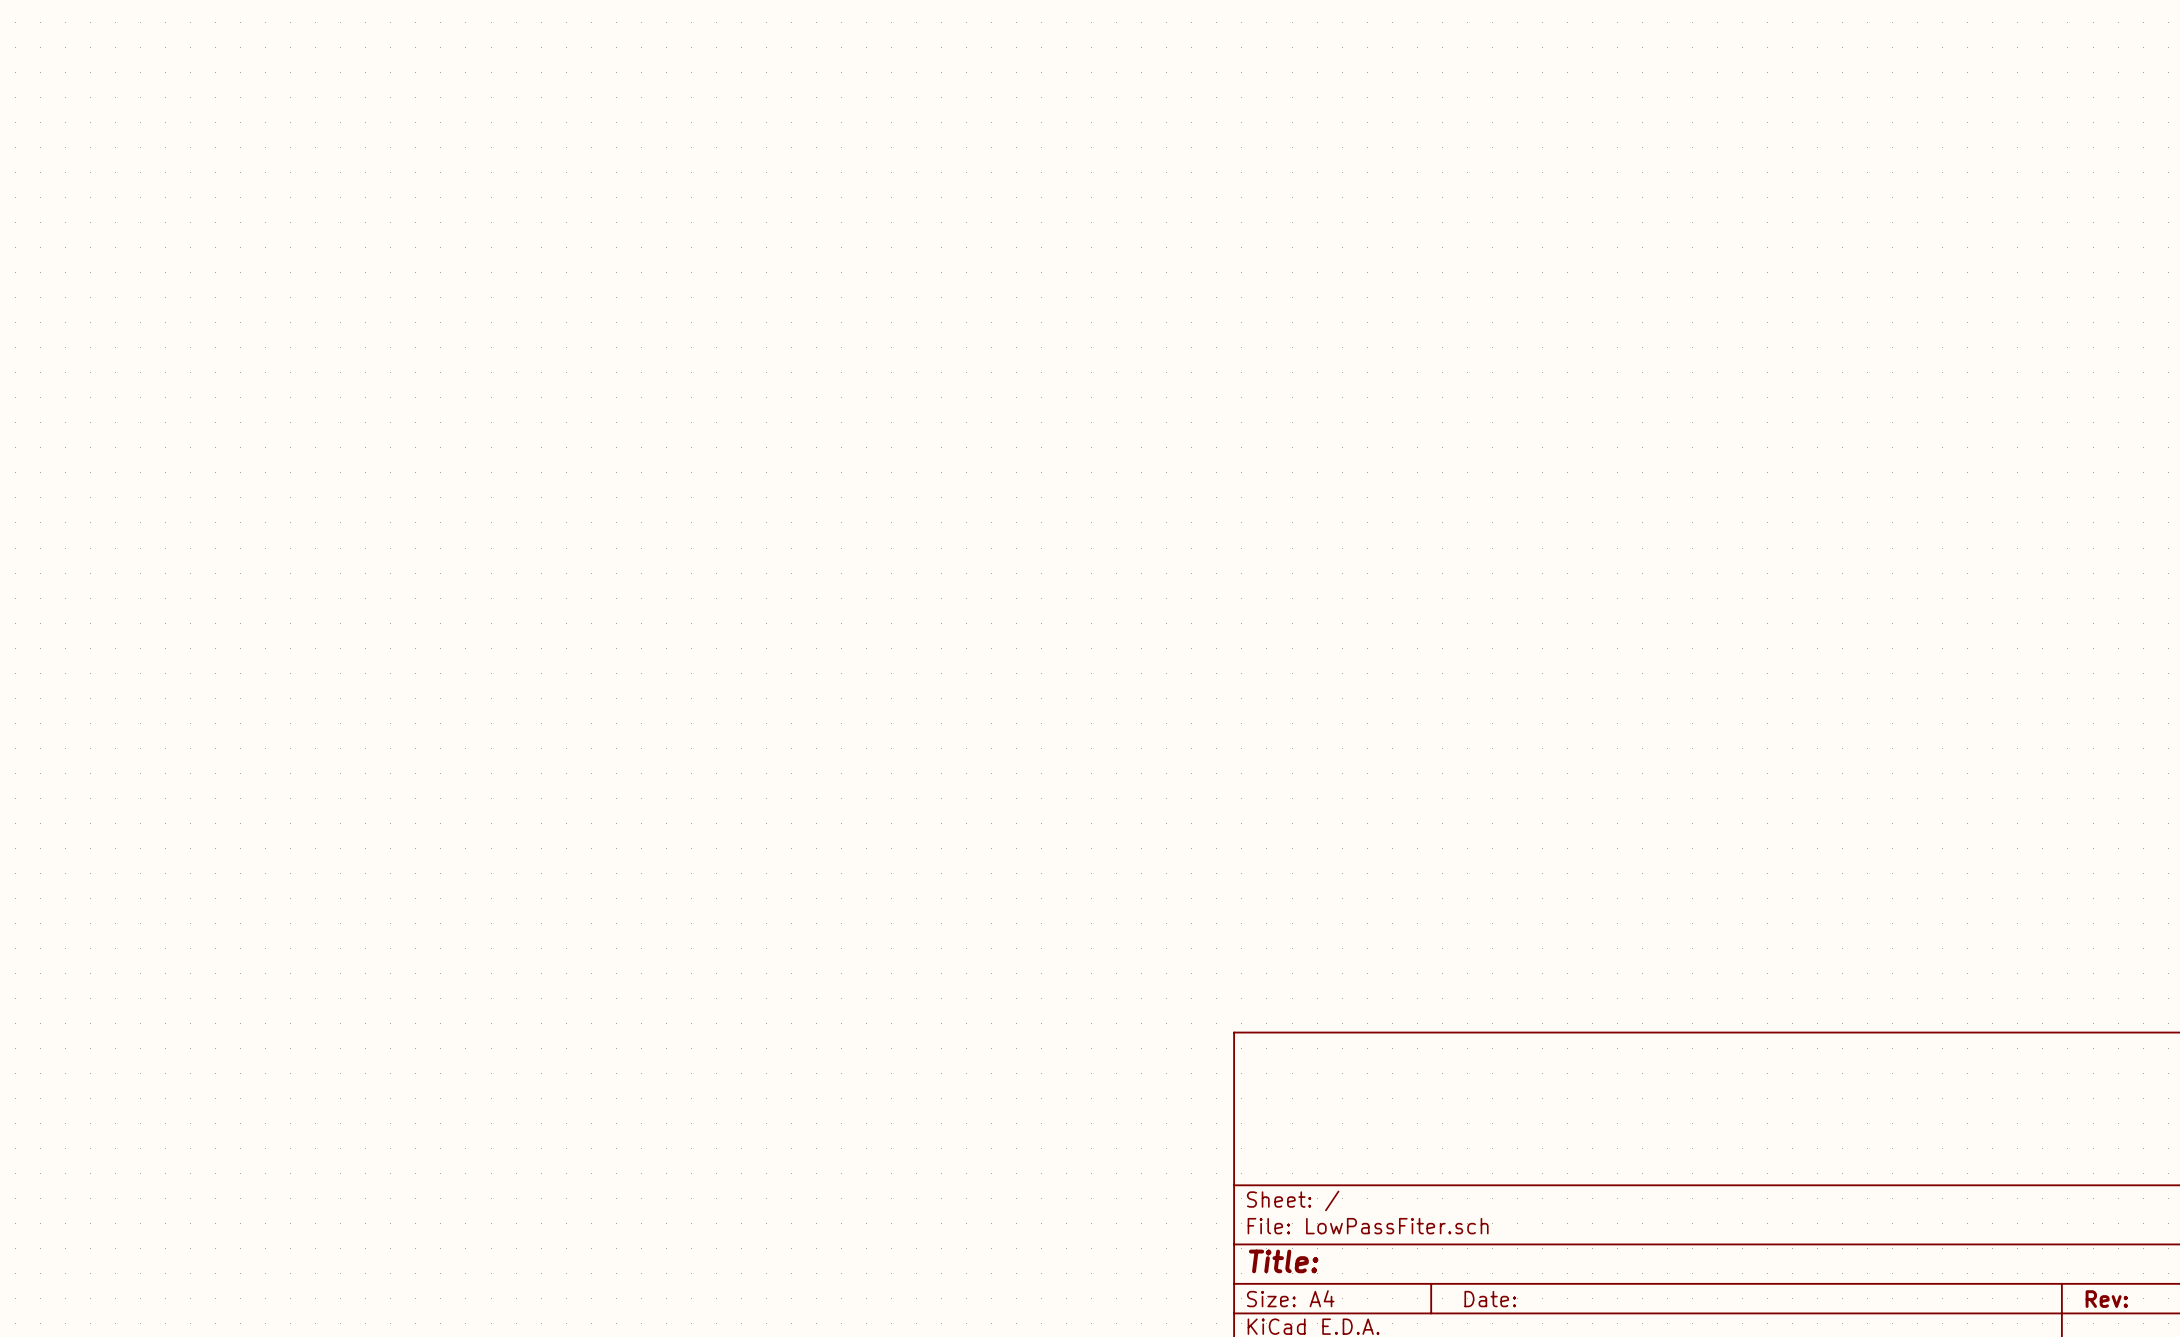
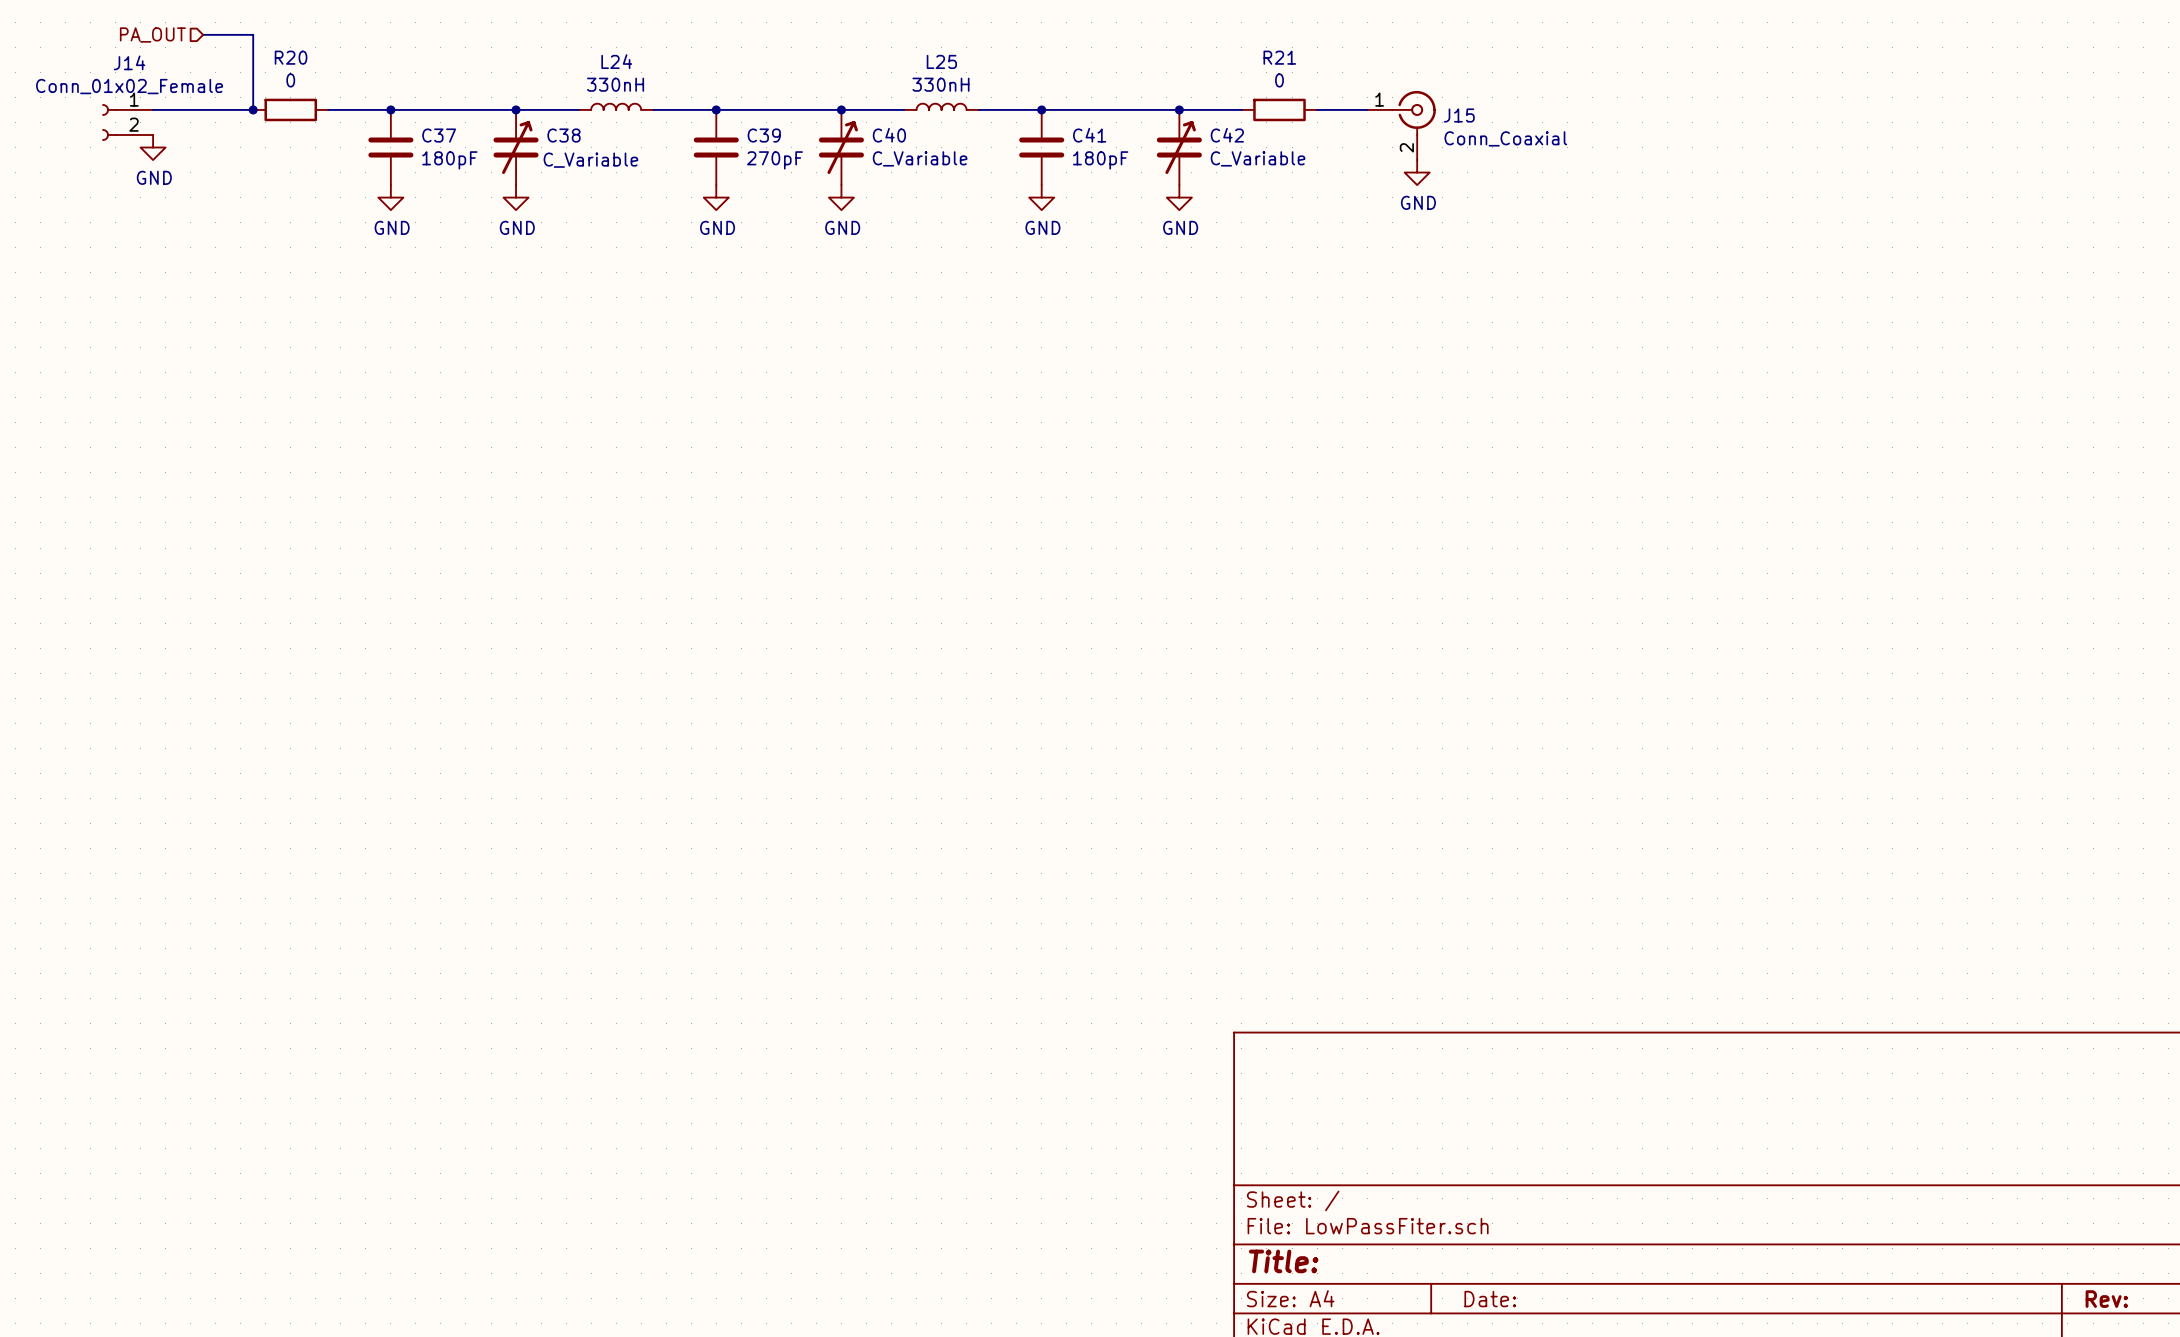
hierarchical label: none -> PA_OUT (152, 34)
wire: none -> (203, 34) (253, 34) (253, 109) (153, 109)
L24: none -> 330nH (616, 106)
L25: none -> 330nH (941, 106)
junction: none -> (253, 109)
R20: none -> 0 (290, 109)
wire: none -> (328, 109) (578, 109)
junction: none -> (390, 109)
junction: none -> (516, 109)
wire: none -> (653, 109) (904, 109)
junction: none -> (716, 109)
junction: none -> (841, 109)
wire: none -> (979, 109) (1241, 109)
junction: none -> (1041, 109)
junction: none -> (1179, 109)
R21: none -> 0 (1279, 109)
wire: none -> (1317, 109) (1367, 109)
J14: none -> Conn_01x02_Female (127, 122)
J15: none -> Conn_Coaxial (1401, 125)
power symbol: none -> GND (153, 147)
C37: none -> 180pF (390, 147)
C38: none -> C_Variable (516, 147)
C39: none -> 270pF (716, 147)
C40: none -> C_Variable (841, 147)
C41: none -> 180pF (1041, 147)
C42: none -> C_Variable (1179, 147)
power symbol: none -> GND (1417, 172)
power symbol: none -> GND (390, 197)
power symbol: none -> GND (516, 197)
power symbol: none -> GND (716, 197)
power symbol: none -> GND (841, 197)
power symbol: none -> GND (1041, 197)
power symbol: none -> GND (1179, 197)

